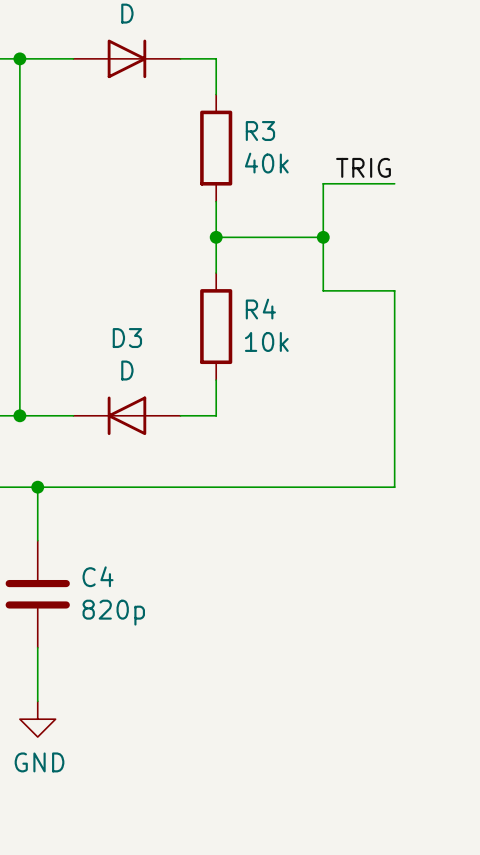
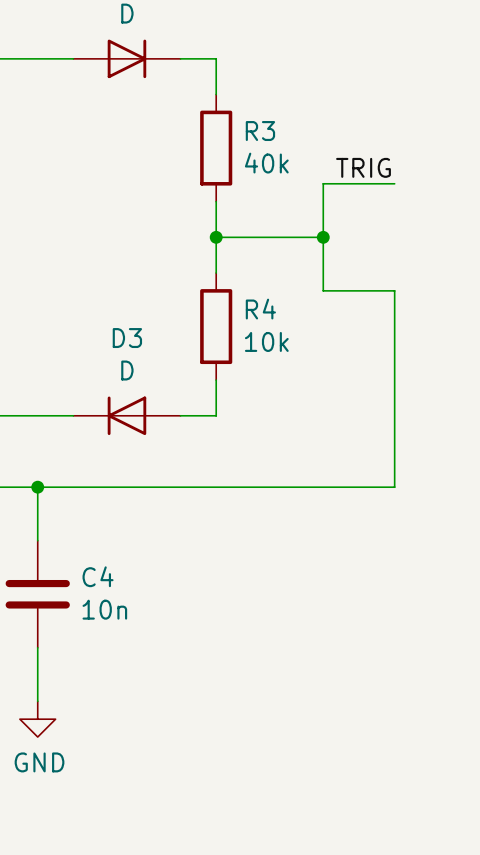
wire: (19, 58) (19, 415) -> none
junction: (19, 58) -> none
junction: (19, 415) -> none
C4 value: 820p (113, 612) -> 10n (104, 609)

